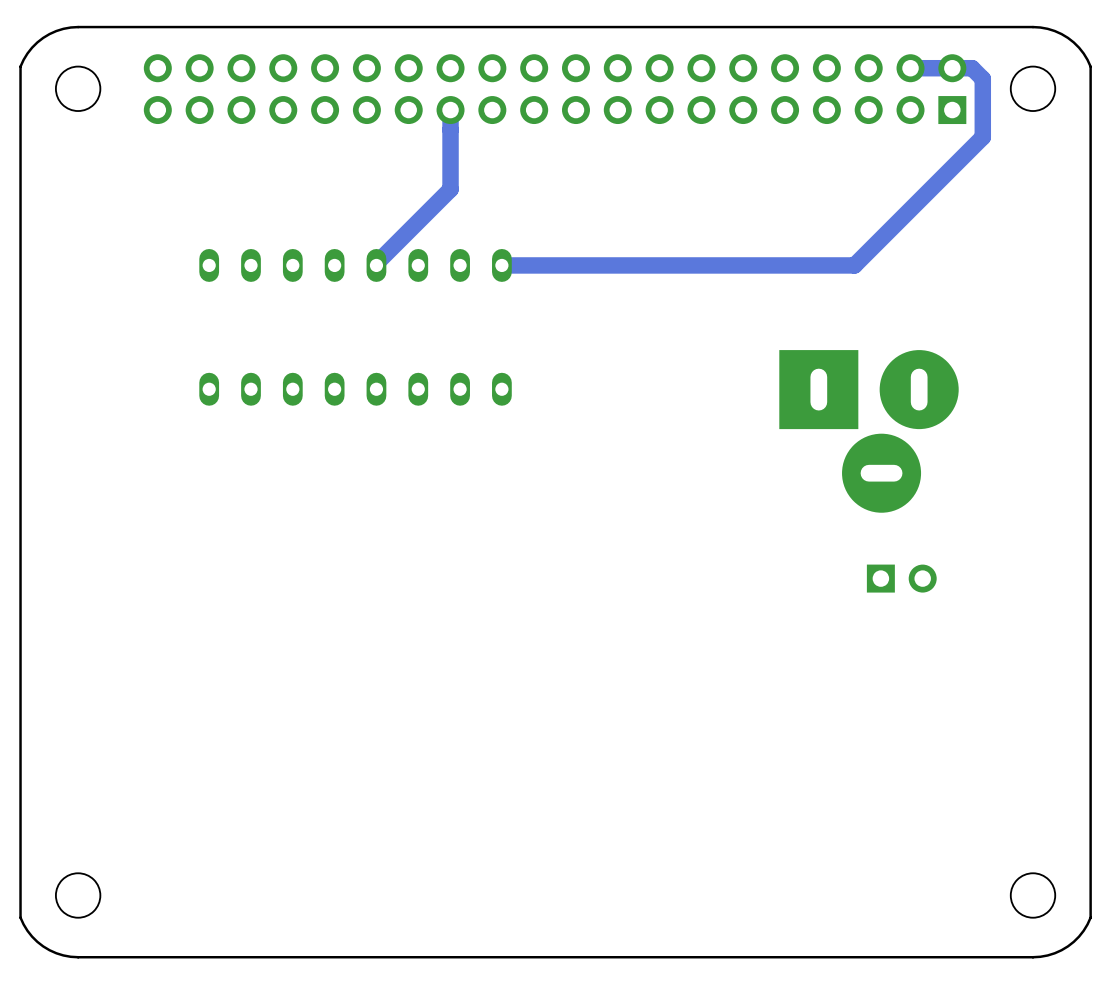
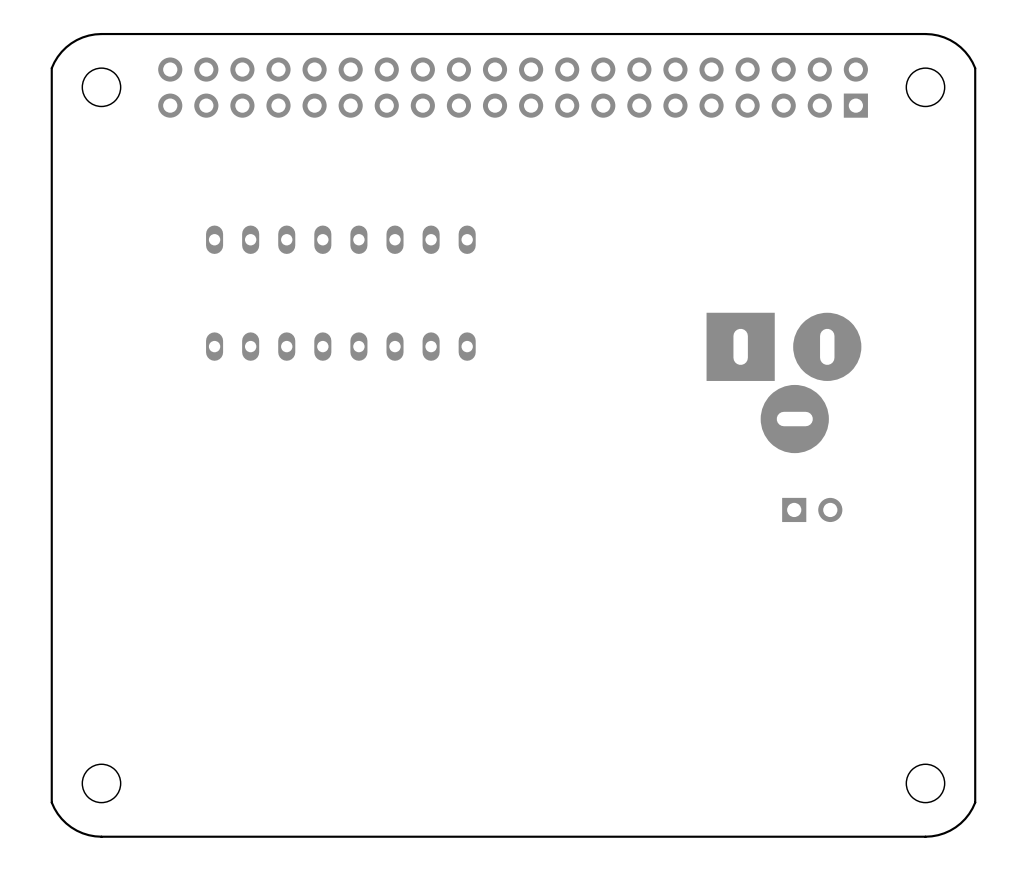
track: (910, 68) (972, 68) (982, 78) (982, 137) (854, 265) (501, 265) -> none
track: (450, 110) (450, 189) (376, 263) -> none

